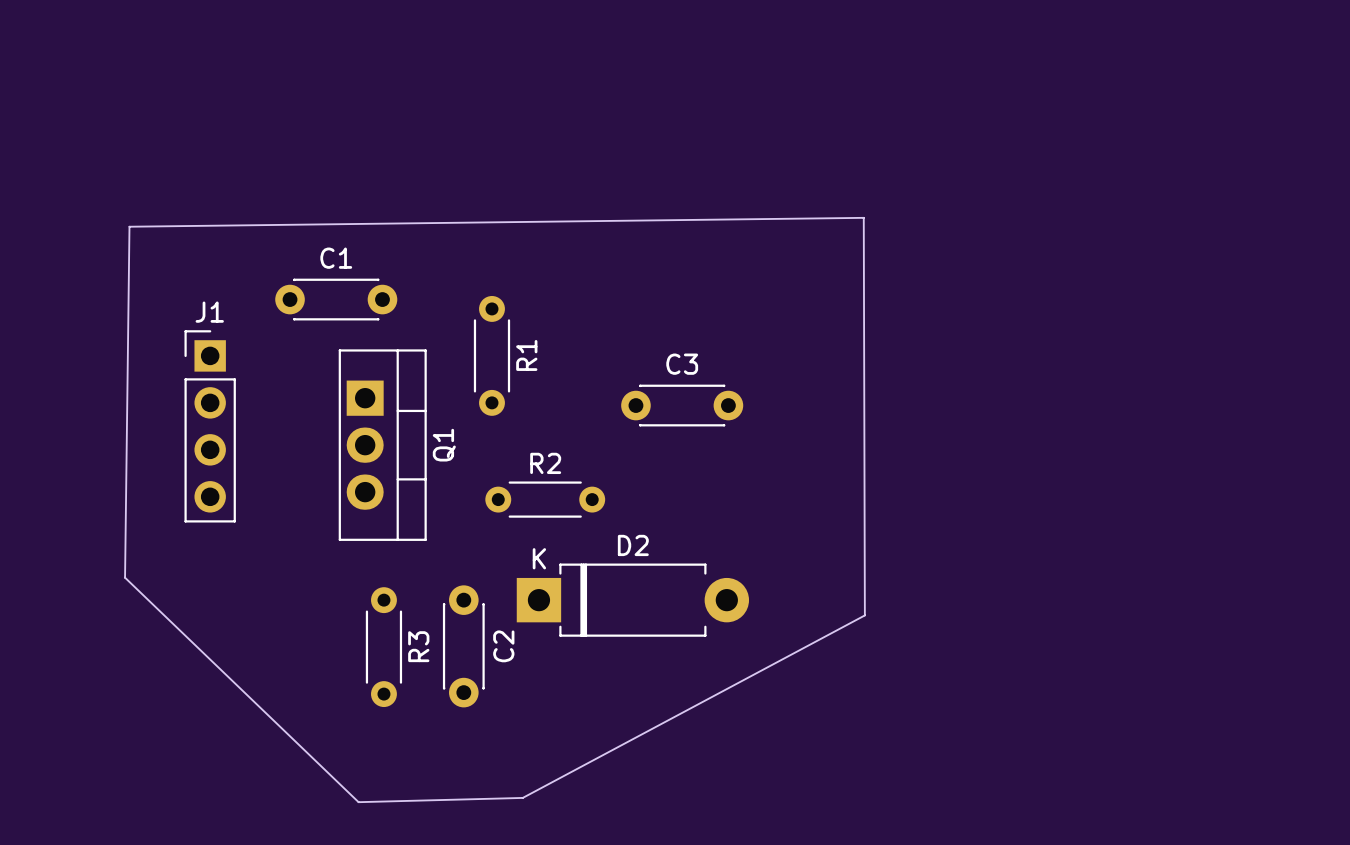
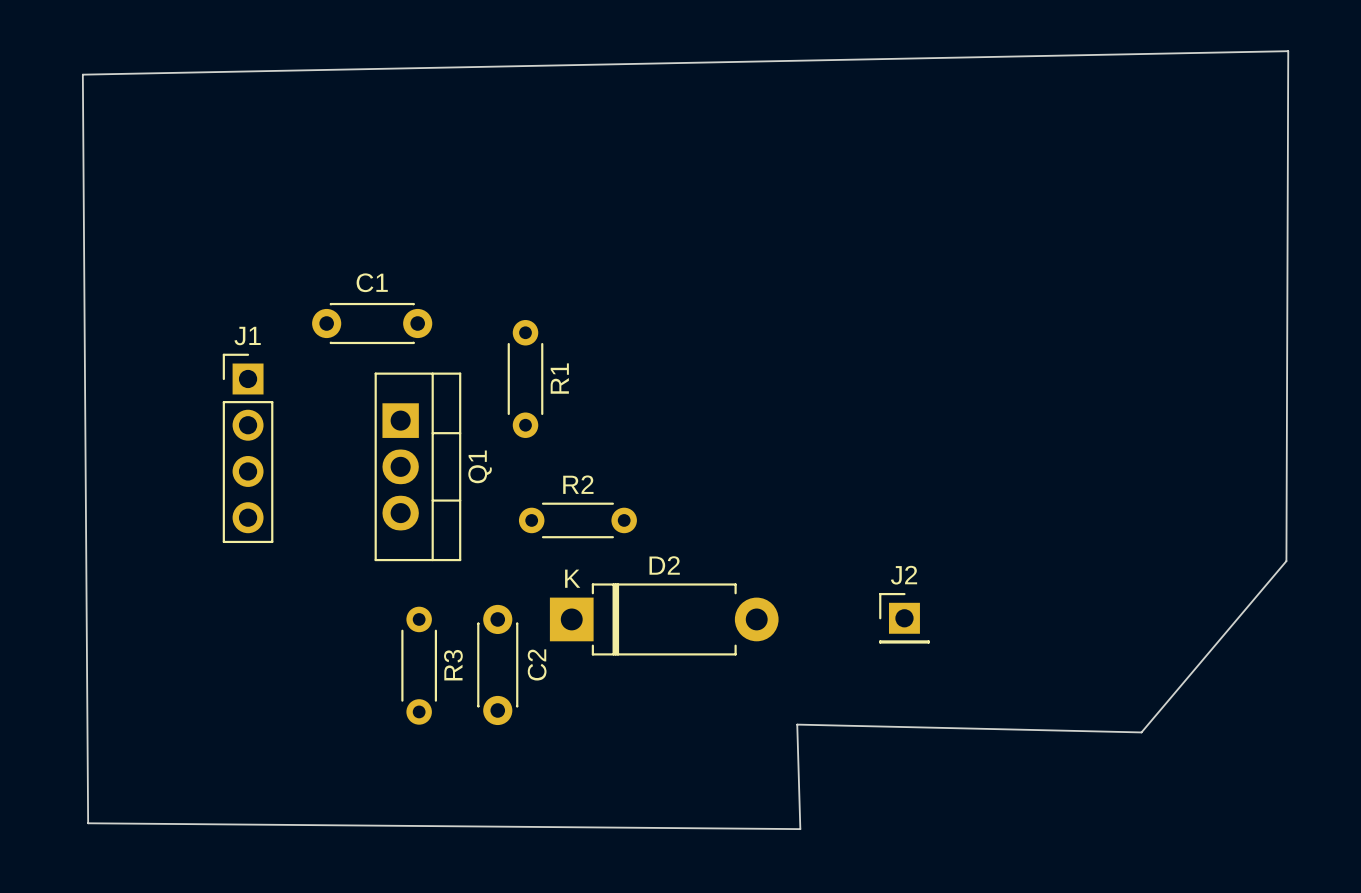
board edge: none -> (1288, 51) (1286, 561) (1141, 732) (797, 724) (800, 829) (88, 823) (82, 74) (1288, 51)
board edge: (863, 217) (864, 615) (522, 797) (358, 802) (125, 577) (129, 226) (863, 217) -> none
C3: (682, 405) -> none
J2: none -> (904, 618)

